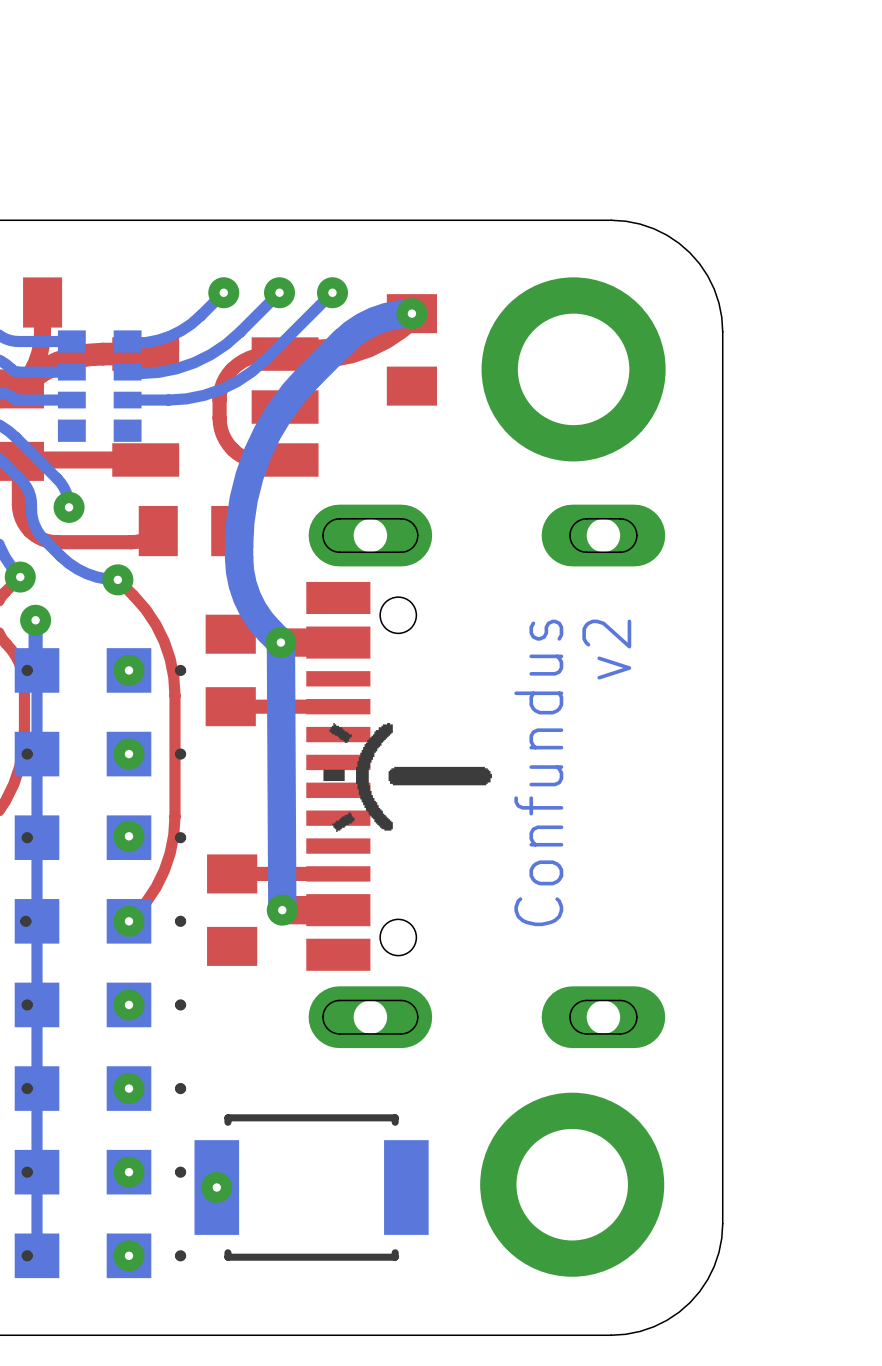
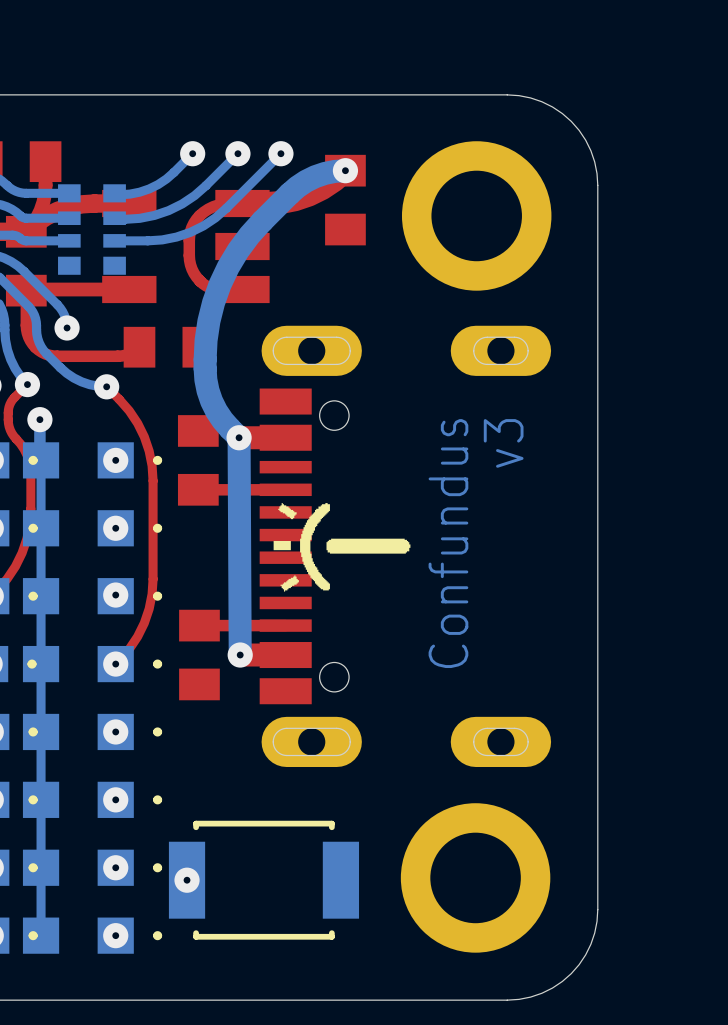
text: v2 (606, 649) -> v3 (503, 443)

